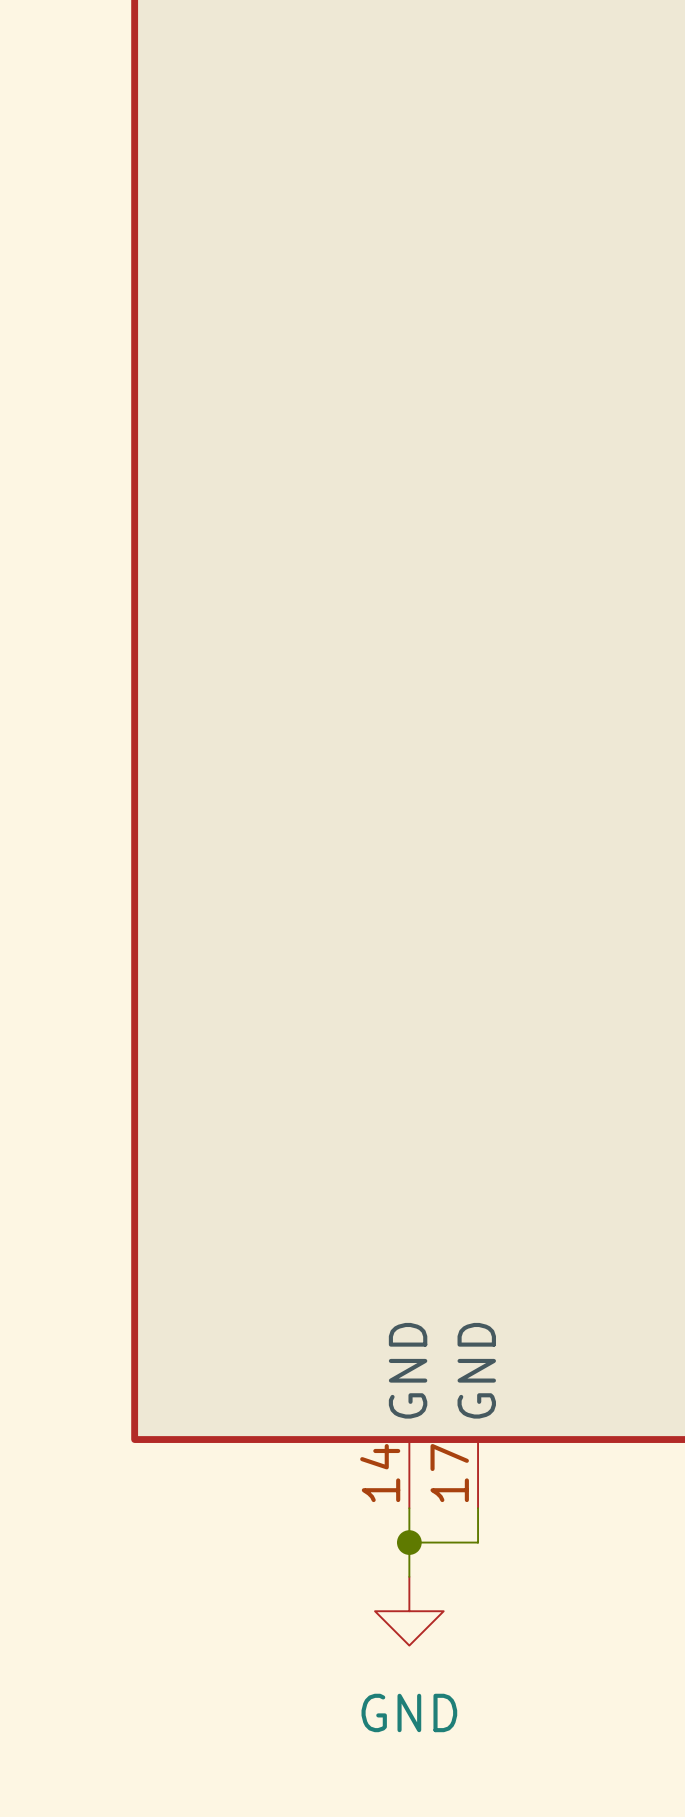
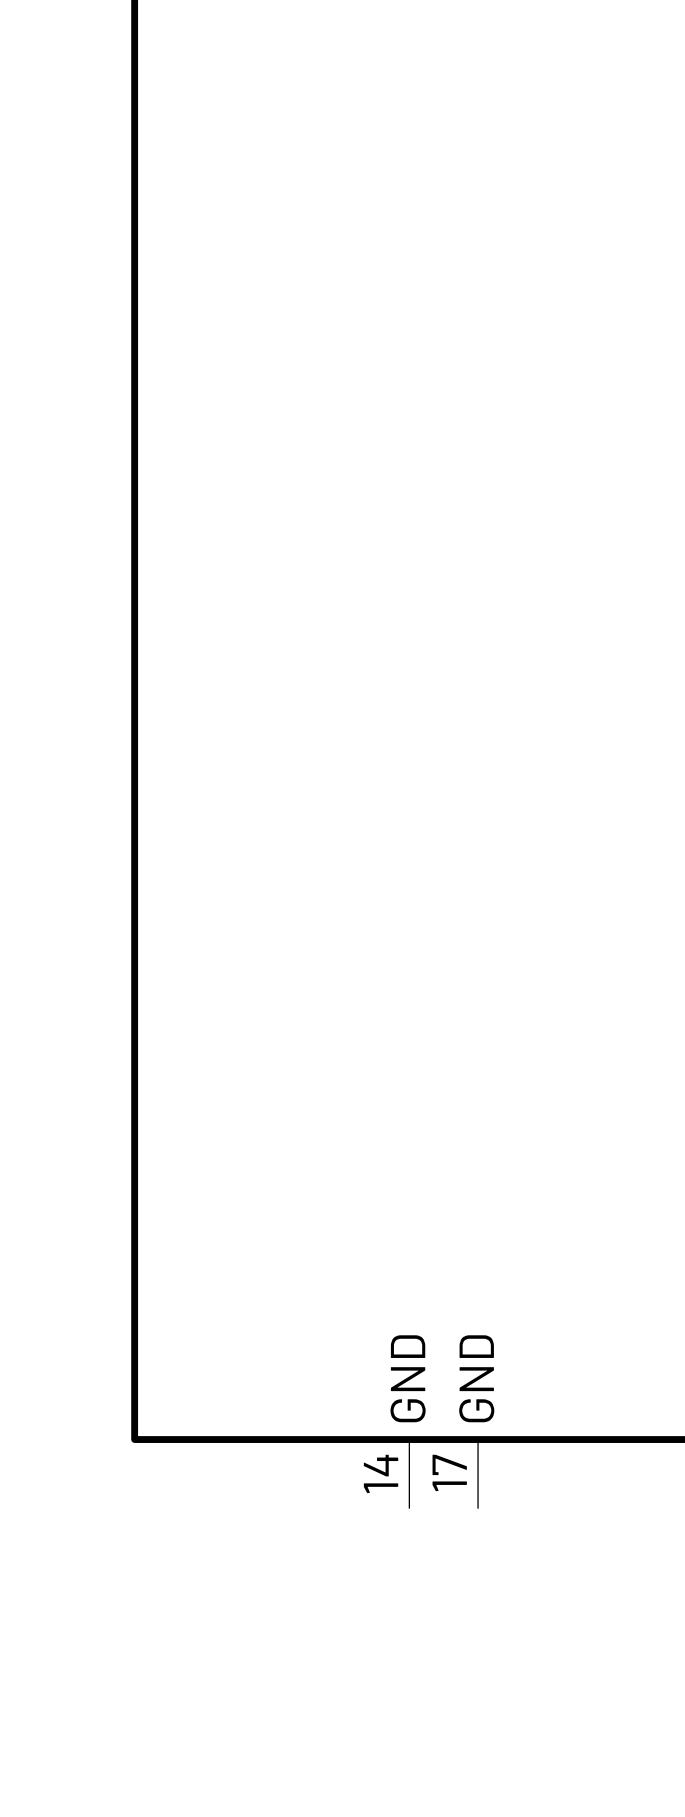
wire: (409, 1508) (409, 1576) -> none
wire: (478, 1508) (478, 1542) (409, 1542) -> none
junction: (409, 1542) -> none
power symbol: GND (409, 1611) -> none

